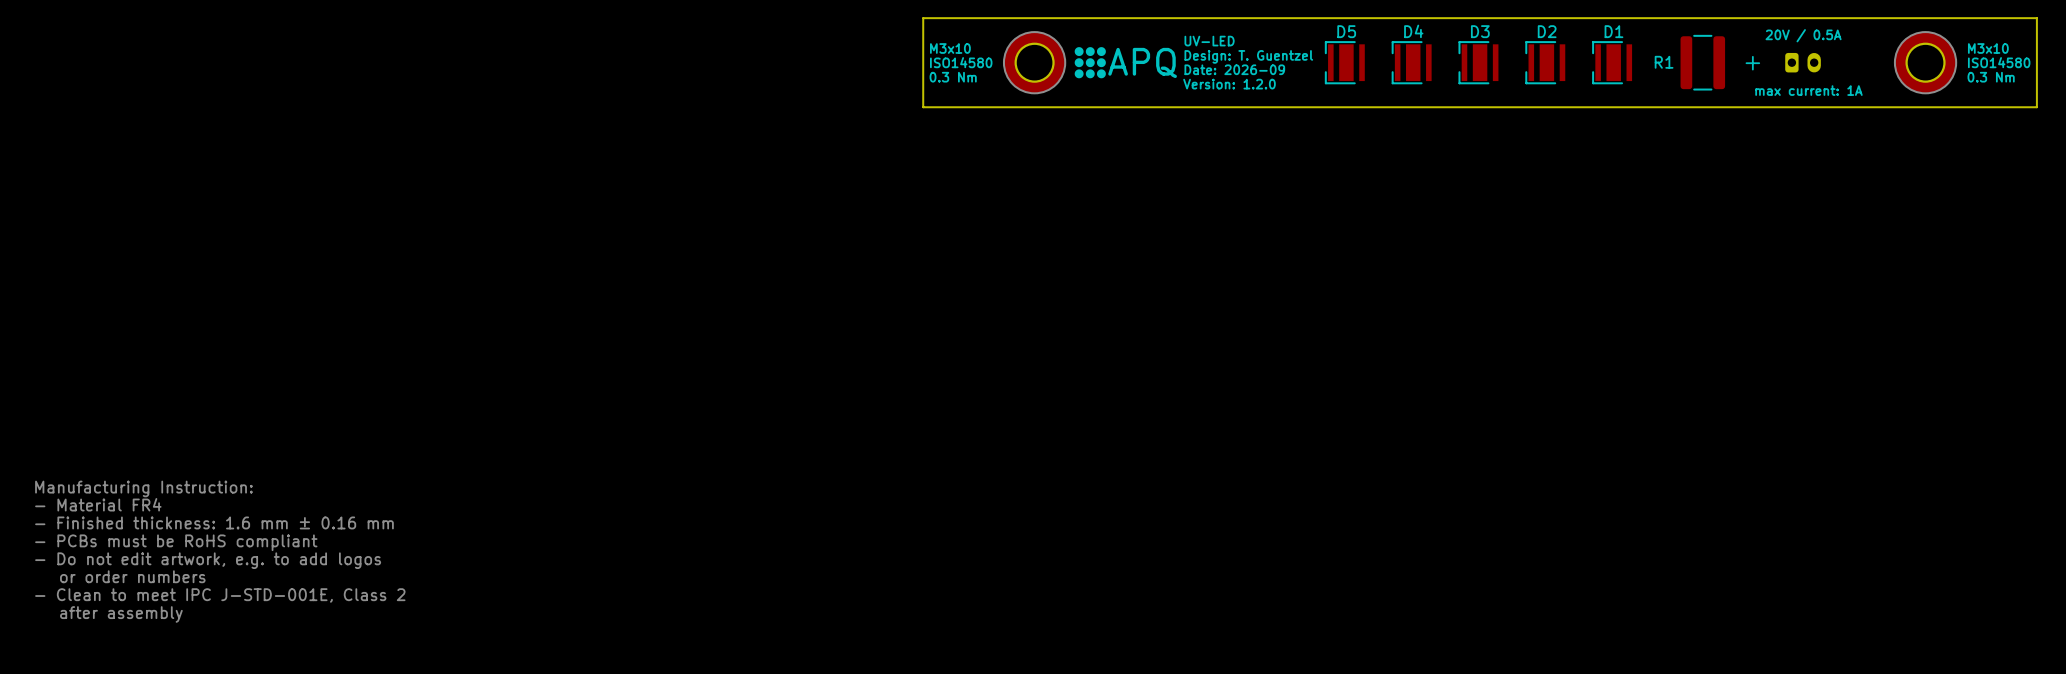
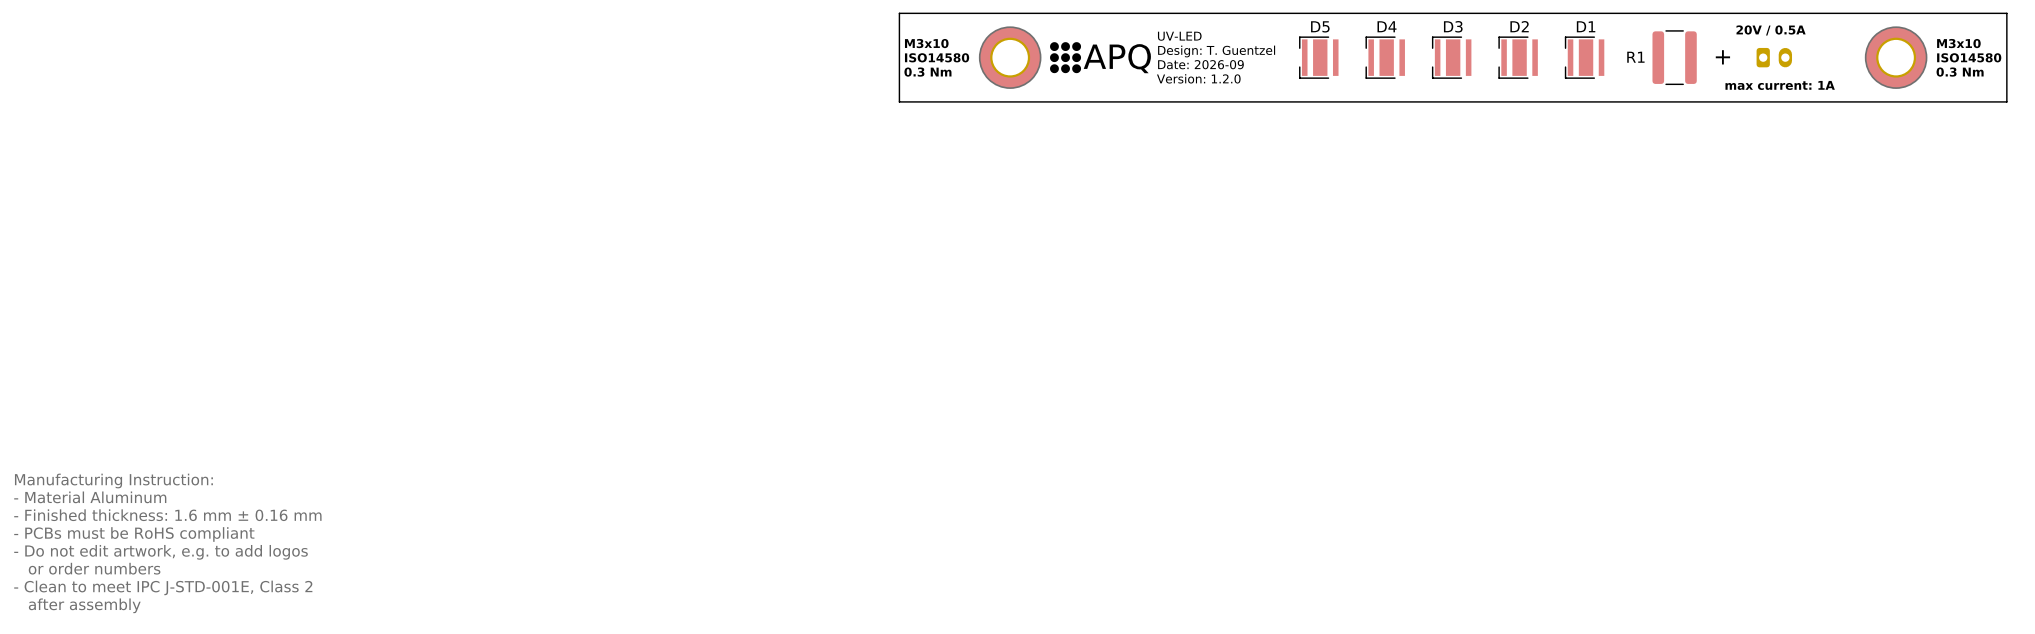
text: - Material FR4 (98, 504) -> - Material Aluminum (90, 497)

